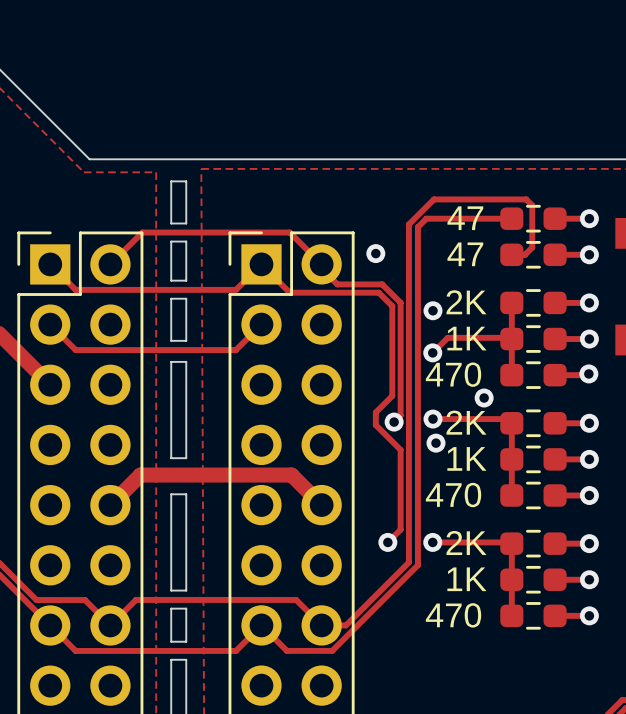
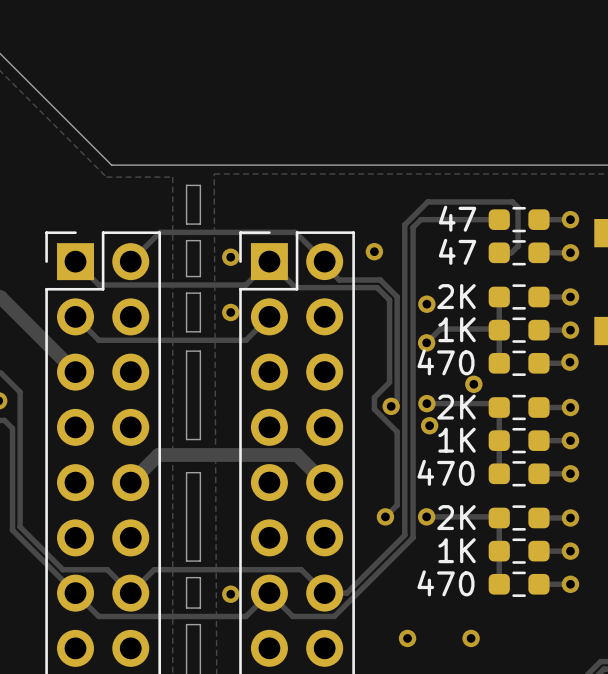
via: none -> (230, 257)
via: none -> (230, 312)
via: none -> (230, 594)
via: none -> (407, 638)
via: none -> (471, 638)

